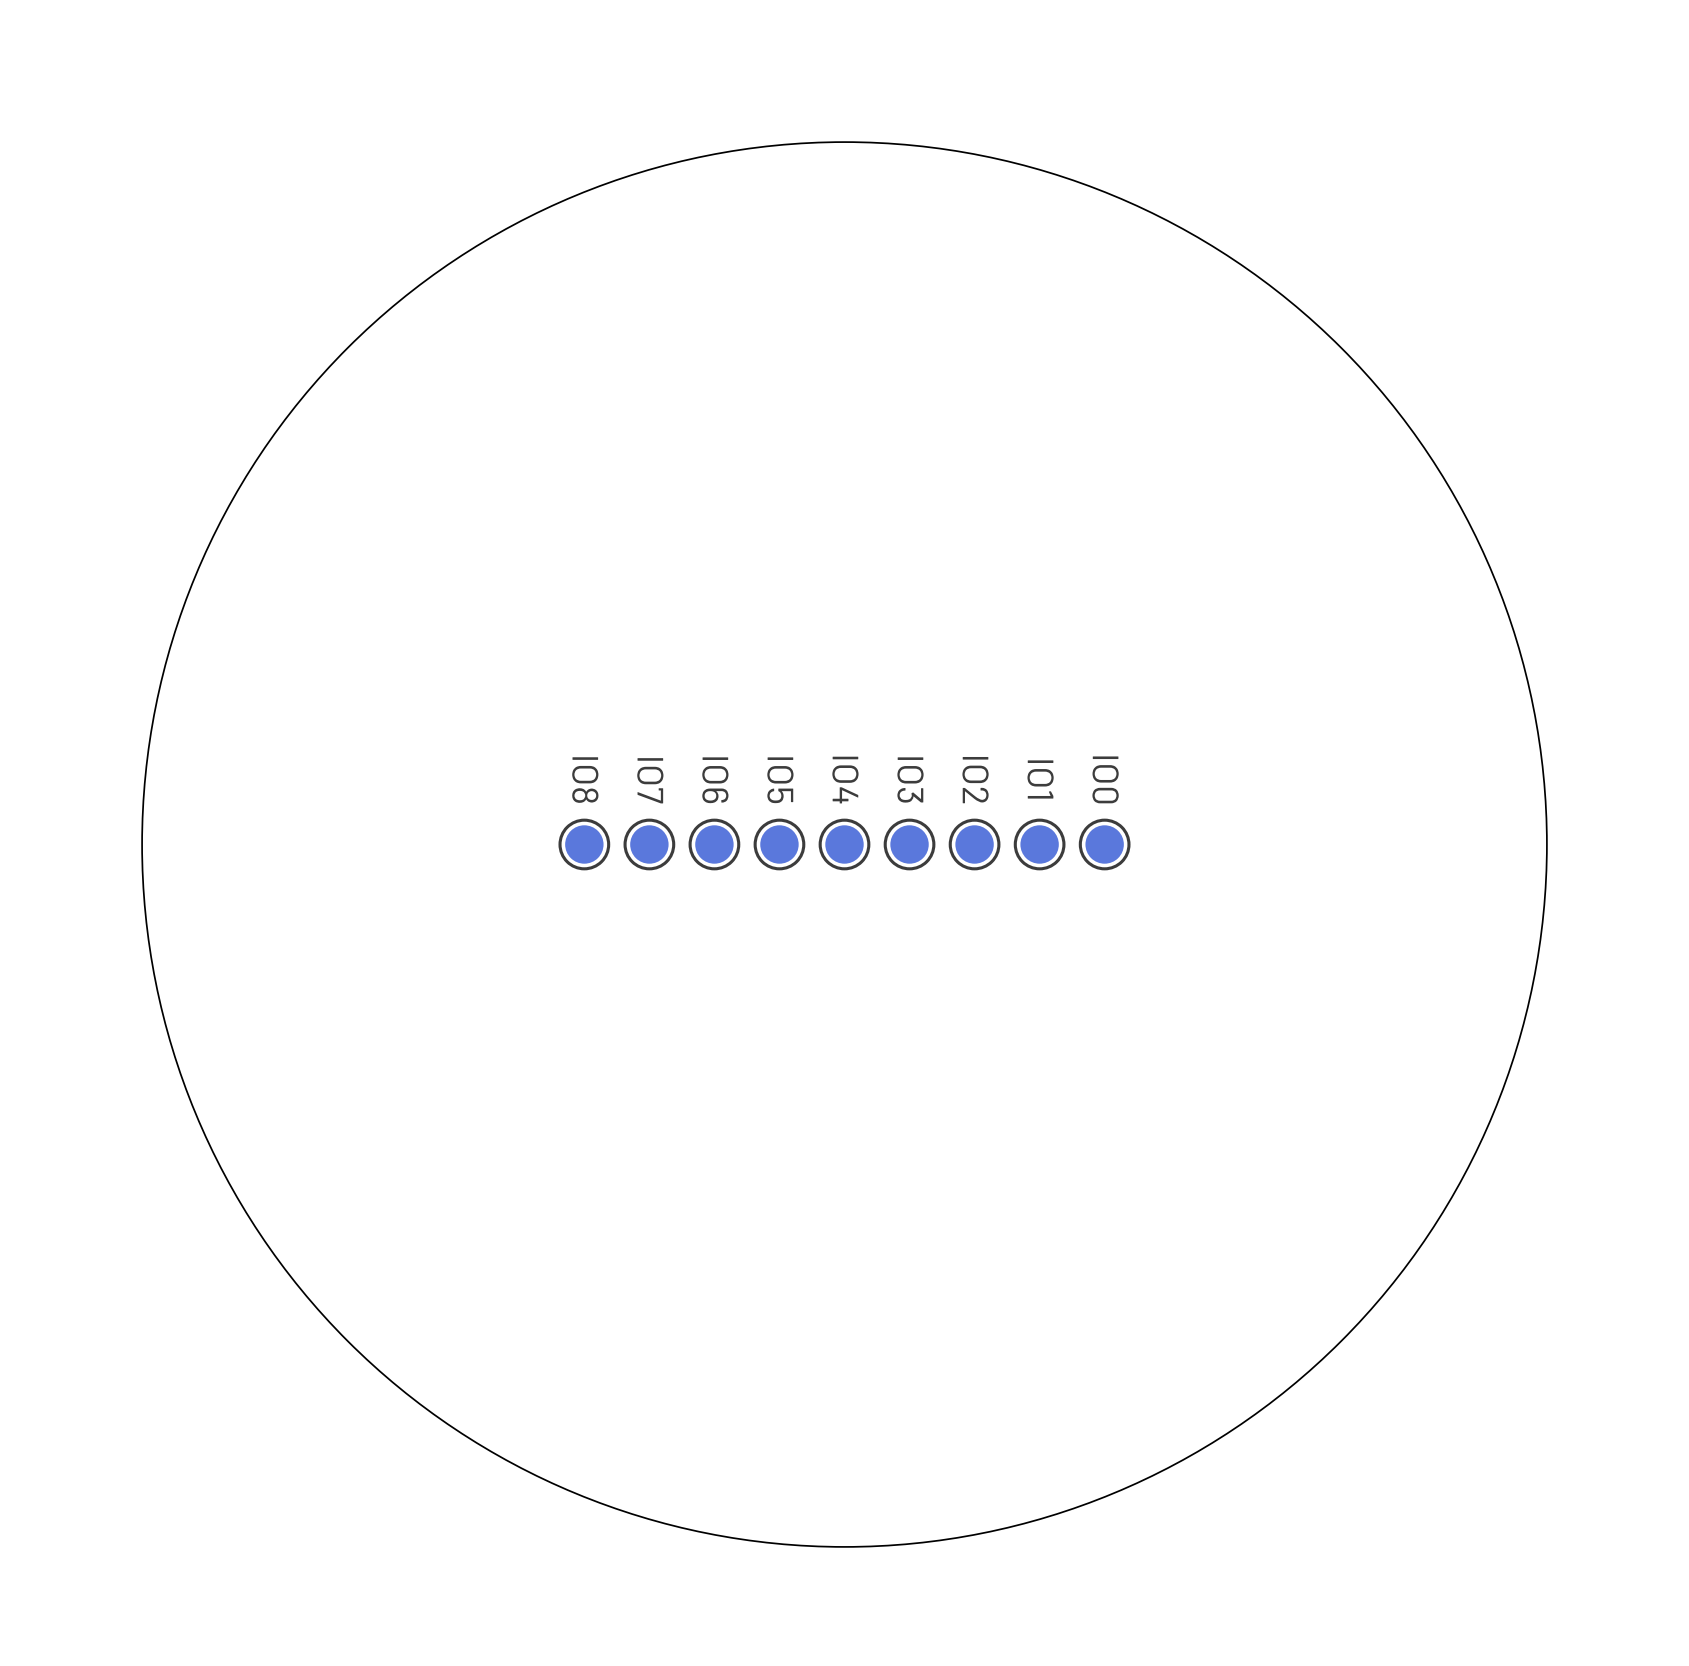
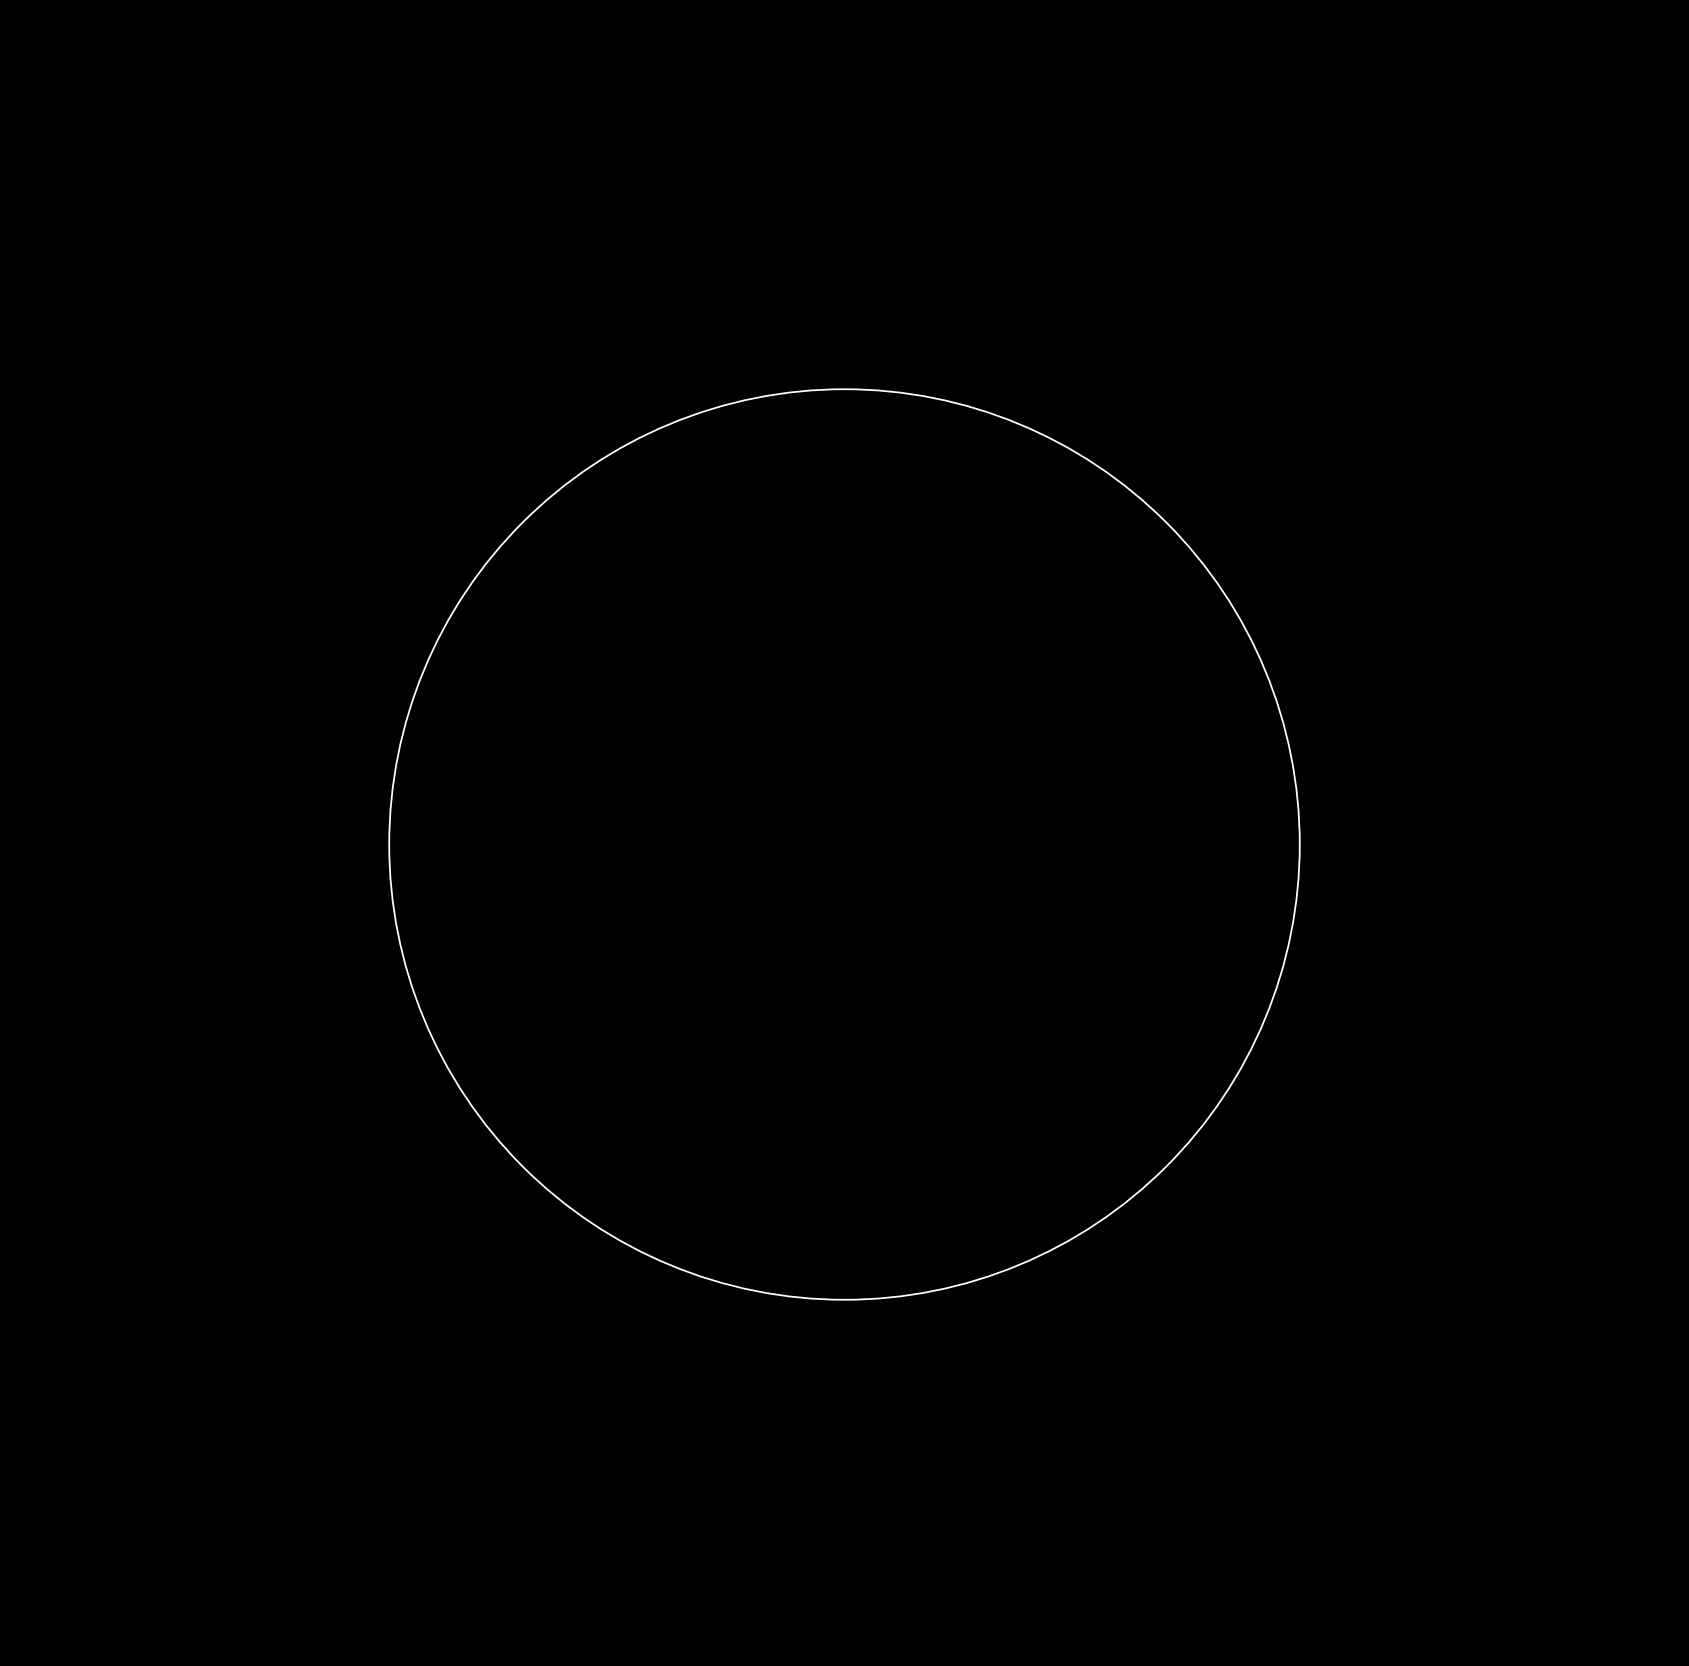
round board edge size: [141, 141, 1548, 1548] -> [388, 388, 1301, 1301]
IO8: (584, 844) -> none
IO7: (649, 844) -> none
IO6: (714, 844) -> none
IO5: (779, 844) -> none
IO4: (844, 844) -> none
IO3: (909, 844) -> none
IO2: (974, 844) -> none
IO1: (1039, 844) -> none
IO0: (1104, 844) -> none

